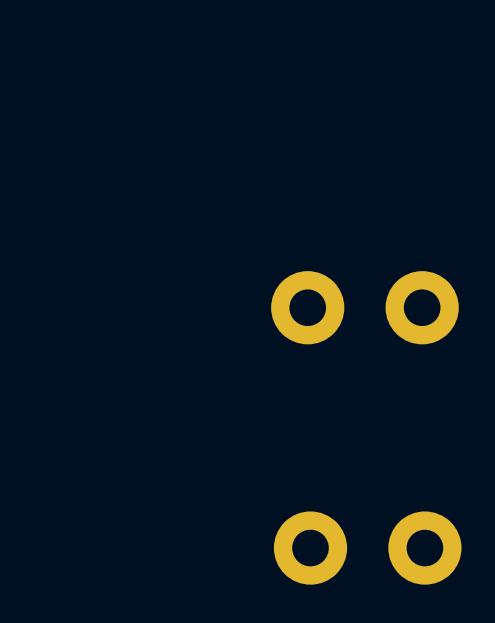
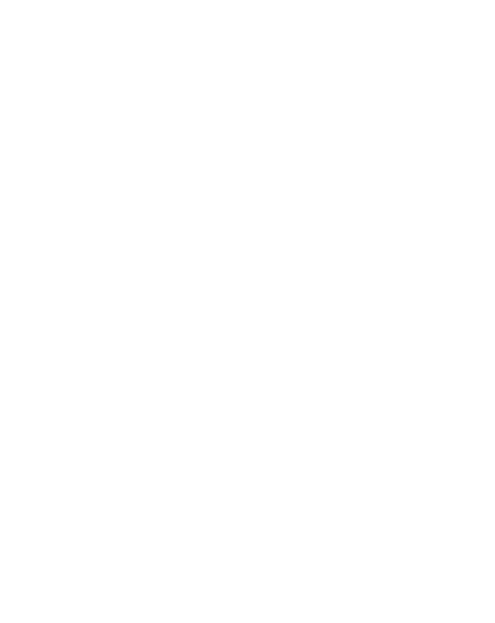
part: (364, 307) -> none
part: (367, 548) -> none

